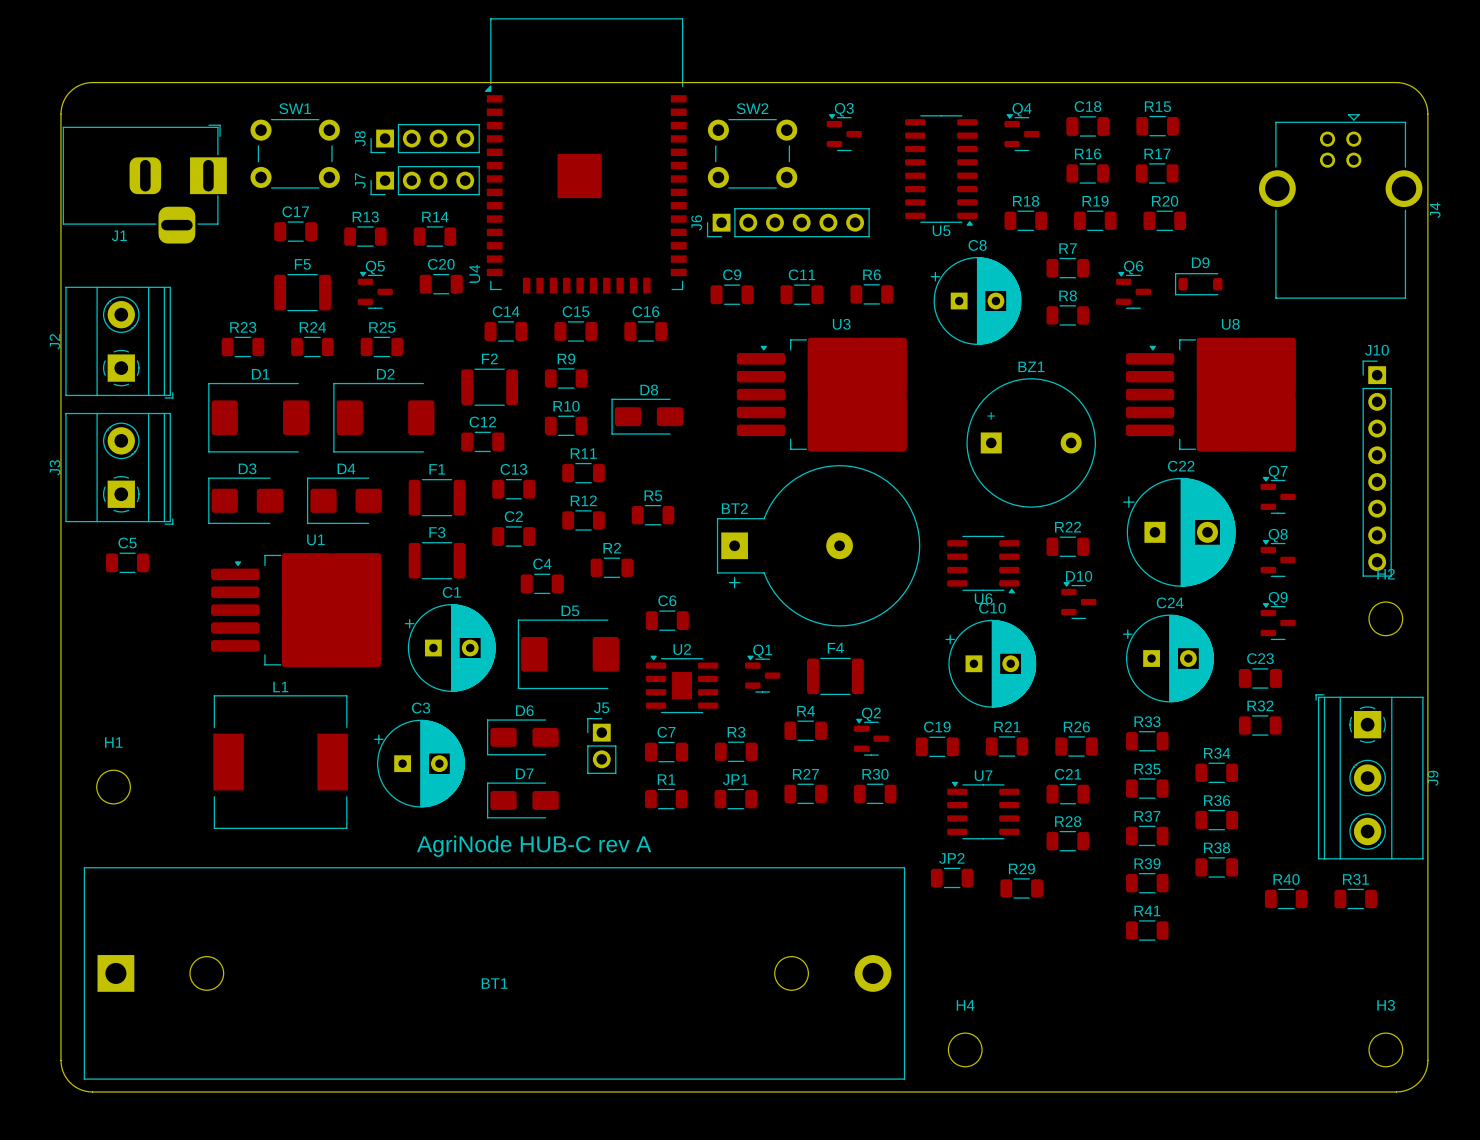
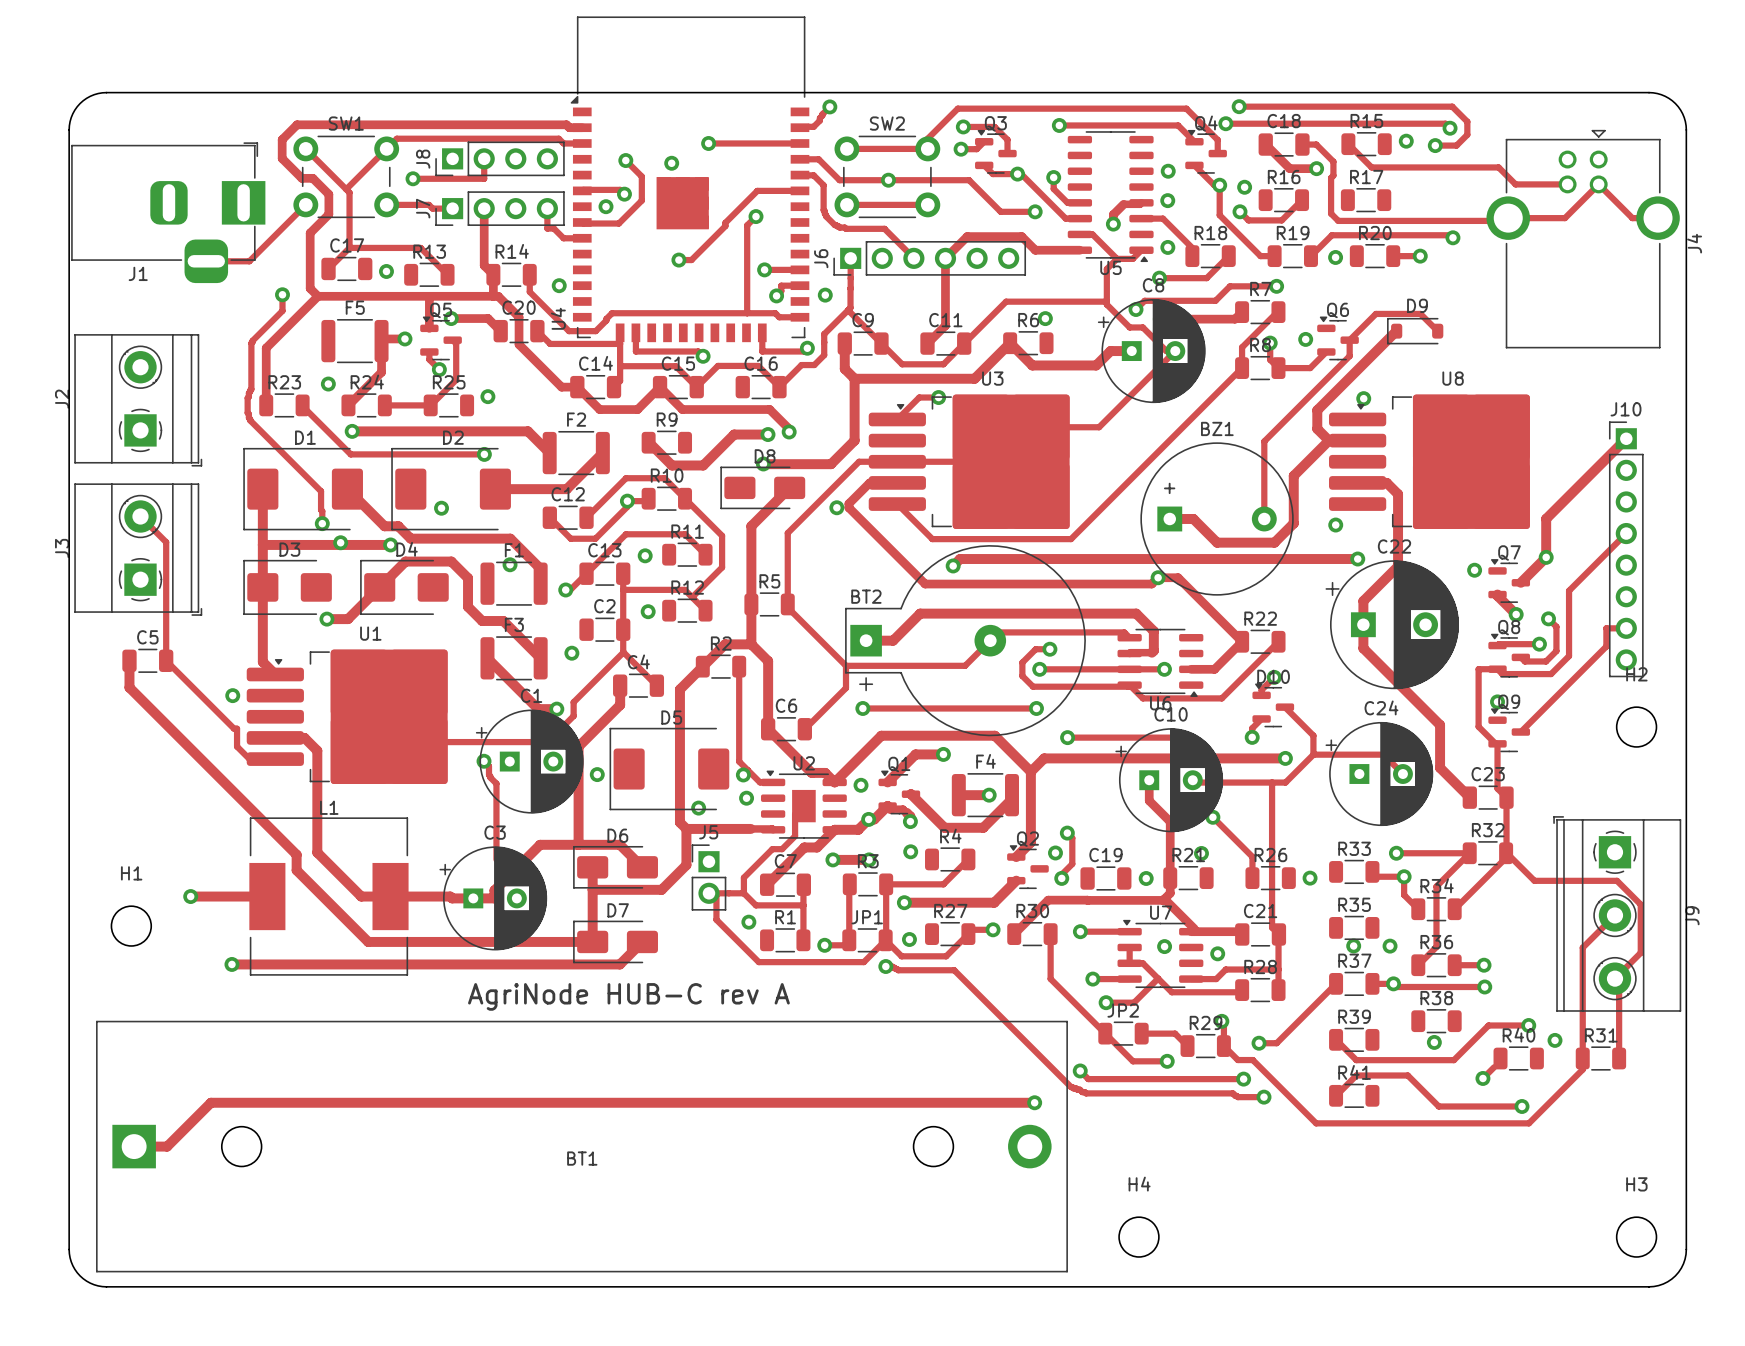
track: none -> (829, 106) (813, 126) (808, 126)
via: none -> (829, 106)
track: none -> (1239, 106) (1452, 106) (1467, 121) (1467, 134) (1456, 145) (1435, 145)
via: none -> (1239, 106)
track: none -> (1225, 123) (1445, 123) (1450, 128)
via: none -> (1225, 123)
track: none -> (1059, 125) (1178, 125) (1194, 141)
via: none -> (1059, 125)
track: none -> (963, 126) (994, 126) (1007, 139) (1007, 153)
via: none -> (963, 126)
track: none -> (582, 127) (569, 127) (566, 124) (297, 124) (282, 139) (282, 158) (301, 178) (312, 178) (328, 194) (328, 214) (310, 233) (310, 288) (318, 296)
via: none -> (1450, 128)
via: none -> (1406, 141)
track: none -> (984, 141) (976, 149) (961, 149)
track: none -> (582, 143) (563, 143) (558, 138) (396, 138) (346, 189)
track: none -> (708, 143) (799, 143)
via: none -> (708, 143)
track: none -> (1265, 144) (1289, 168) (1316, 168)
track: none -> (1302, 144) (1316, 144) (1333, 161) (1333, 175) (1331, 177) (1331, 213) (1338, 220) (1505, 220) (1508, 218) (1564, 218) (1598, 184) (1632, 218) (1658, 218)
track: none -> (1348, 144) (1371, 167) (1498, 167) (1515, 184) (1567, 184)
via: none -> (1435, 145)
track: none -> (305, 148) (349, 192) (349, 247)
track: none -> (846, 148) (927, 148) (927, 138) (957, 108) (1186, 108) (1217, 139) (1217, 153)
via: none -> (961, 149)
track: none -> (484, 158) (484, 178) (413, 178)
track: none -> (799, 159) (818, 159) (839, 180) (969, 180) (1000, 211) (1035, 211)
track: none -> (625, 160) (641, 176) (641, 200) (618, 223) (582, 222)
via: none -> (625, 160)
via: none -> (671, 163)
track: none -> (984, 165) (992, 174) (1021, 174) (1065, 218) (1079, 218)
track: none -> (1194, 165) (1214, 185) (1219, 185) (1219, 215) (1260, 256) (1274, 256)
via: none -> (1316, 168)
via: none -> (1168, 171)
via: none -> (1017, 174)
track: none -> (808, 175) (813, 175) (823, 185) (823, 210) (826, 216) (834, 225) (846, 228) (884, 228) (906, 251)
track: none -> (1053, 177) (1053, 188) (1067, 202) (1079, 202)
via: none -> (1053, 177)
via: none -> (413, 178)
via: none -> (888, 180)
via: none -> (1219, 185)
via: none -> (1244, 187)
track: none -> (582, 190) (620, 189) (624, 194)
track: none -> (799, 190) (757, 190) (691, 260) (678, 260)
via: none -> (624, 194)
via: none -> (1167, 200)
track: none -> (1302, 200) (1281, 220) (1248, 220) (1240, 211)
track: none -> (1141, 202) (1123, 204) (1113, 214) (1113, 224)
track: none -> (305, 204) (249, 261) (206, 261)
track: none -> (386, 204) (428, 204) (432, 208) (452, 208)
track: none -> (846, 204) (927, 204)
via: none -> (606, 206)
track: none -> (484, 208) (484, 265) (493, 274) (493, 296)
track: none -> (547, 208) (547, 228) (553, 228) (563, 238) (582, 238)
via: none -> (1035, 211)
via: none -> (1240, 211)
track: none -> (756, 216) (747, 225) (747, 313)
via: none -> (756, 216)
track: none -> (1141, 218) (1162, 218) (1192, 248) (1192, 256)
via: none -> (1113, 224)
track: none -> (1079, 234) (1092, 234) (1117, 258)
track: none -> (1452, 237) (1450, 235) (1331, 235) (1310, 256)
via: none -> (1452, 237)
track: none -> (349, 247) (328, 268)
track: none -> (349, 247) (420, 247) (447, 274)
via: none -> (1167, 247)
track: none -> (1079, 250) (1035, 250) (1021, 236) (967, 236) (945, 258) (945, 325) (927, 343)
track: none -> (1141, 250) (1132, 258) (1117, 258)
track: none -> (1228, 256) (1206, 278) (1159, 278)
track: none -> (1393, 256) (1420, 256)
via: none -> (1420, 256)
via: none -> (1335, 257)
track: none -> (850, 258) (850, 307) (824, 334) (824, 355) (814, 365) (801, 365) (779, 387) (758, 365) (717, 365) (696, 387) (675, 366) (620, 366)
track: none -> (1117, 258) (1106, 269) (1106, 304) (1129, 327) (1142, 327) (1166, 351) (1175, 351) (1099, 427) (980, 427)
via: none -> (678, 260)
track: none -> (764, 269) (799, 269)
via: none -> (764, 269)
via: none -> (386, 271)
track: none -> (529, 274) (529, 291) (569, 331) (595, 331) (612, 313) (775, 313) (779, 317) (799, 317)
via: none -> (1159, 278)
via: none -> (559, 285)
track: none -> (799, 285) (781, 285) (781, 291) (776, 295)
track: none -> (1276, 286) (1230, 286) (1215, 300) (1144, 300) (1136, 309)
via: none -> (1276, 286)
track: none -> (282, 294) (282, 310) (251, 343) (251, 389) (247, 398) (247, 412) (250, 420) (321, 491) (322, 523)
via: none -> (282, 294)
via: none -> (825, 295)
track: none -> (318, 296) (266, 348) (266, 405)
track: none -> (318, 296) (498, 296) (519, 317) (519, 344) (561, 387) (577, 387) (599, 409) (637, 409) (660, 387) (682, 409) (769, 409) (789, 428) (789, 431)
track: none -> (429, 296) (429, 328)
via: none -> (776, 295)
track: none -> (1106, 301) (1006, 301) (943, 364) (902, 364) (848, 310)
via: none -> (1136, 309)
track: none -> (1242, 312) (1235, 319) (1160, 319)
track: none -> (1278, 312) (1242, 347) (1242, 368) (1071, 539) (932, 539) (897, 504)
track: none -> (451, 318) (488, 318) (500, 331)
via: none -> (451, 318)
via: none -> (1045, 318)
track: none -> (537, 331) (550, 343) (620, 343)
track: none -> (1396, 331) (1317, 410) (1317, 428) (1328, 440)
track: none -> (1437, 331) (1420, 313) (1375, 313) (1349, 340) (1349, 356) (1264, 441) (1264, 518)
track: none -> (620, 332) (620, 381) (614, 387)
track: none -> (635, 332) (635, 351) (698, 351) (703, 356)
track: none -> (762, 332) (762, 351) (804, 351) (807, 348)
track: none -> (404, 338) (383, 338) (381, 341) (381, 372) (348, 405)
via: none -> (404, 338)
track: none -> (452, 340) (456, 343) (456, 379) (430, 405) (384, 405)
via: none -> (1305, 339)
track: none -> (844, 343) (844, 368) (854, 378)
track: none -> (1270, 343) (1270, 359) (1278, 368) (1310, 368) (1326, 351)
via: none -> (1270, 343)
via: none -> (807, 348)
track: none -> (429, 351) (429, 359) (439, 369)
track: none -> (1131, 351) (1110, 351) (1096, 365) (1032, 365) (1010, 343) (974, 378) (854, 378)
via: none -> (703, 356)
via: none -> (439, 369)
track: none -> (854, 378) (854, 440) (831, 464) (763, 463)
via: none -> (328, 384)
via: none -> (487, 396)
track: none -> (938, 397) (919, 397) (897, 419)
via: none -> (938, 397)
via: none -> (1363, 398)
track: none -> (302, 405) (350, 454) (484, 454)
track: none -> (352, 431) (527, 431) (549, 453)
via: none -> (352, 431)
via: none -> (789, 431)
track: none -> (768, 434) (734, 434) (703, 465) (672, 465) (648, 442)
via: none -> (768, 434)
track: none -> (1626, 438) (1546, 518) (1546, 557) (1520, 582)
track: none -> (1328, 440) (1293, 475) (1293, 523) (1274, 542) (1217, 542) (1193, 518) (1169, 518)
track: none -> (602, 453) (566, 489) (495, 489)
via: none -> (484, 454)
track: none -> (1011, 461) (859, 461) (787, 533) (787, 607) (846, 665)
via: none -> (763, 463)
track: none -> (897, 482) (869, 482) (848, 503) (848, 507) (925, 584) (1151, 584) (1158, 577) (1178, 577) (1242, 641) (1214, 669) (1191, 669)
track: none -> (1357, 482) (1386, 482) (1398, 494) (1398, 566) (1363, 601) (1363, 648) (1440, 725) (1440, 767) (1469, 797)
track: none -> (789, 487) (751, 526) (751, 644)
track: none -> (262, 489) (262, 661) (275, 674)
track: none -> (347, 489) (384, 526) (398, 526) (410, 538) (510, 538) (540, 568) (540, 583)
track: none -> (648, 498) (646, 501) (627, 501) (627, 506) (595, 538) (570, 538) (549, 517)
via: none -> (627, 501)
via: none -> (441, 508)
via: none -> (836, 507)
track: none -> (140, 516) (166, 542) (166, 660) (234, 728) (237, 728) (237, 746) (249, 759) (275, 759)
track: none -> (586, 517) (626, 478) (664, 478) (722, 535) (722, 567) (692, 597)
via: none -> (322, 523)
via: none -> (1335, 525)
track: none -> (1626, 533) (1569, 590) (1569, 656) (1551, 674) (1502, 674) (1497, 669) (1478, 669) (1478, 726) (1497, 743) (1497, 788) (1506, 797) (1506, 852)
via: none -> (340, 542)
track: none -> (262, 544) (390, 544)
via: none -> (390, 544)
track: none -> (705, 554) (685, 534) (625, 534) (570, 589) (565, 589)
via: none -> (645, 555)
via: none -> (1546, 557)
track: none -> (1357, 559) (960, 559) (953, 565)
via: none -> (1357, 559)
via: none -> (510, 564)
via: none -> (953, 565)
via: none -> (1474, 570)
track: none -> (623, 573) (623, 652) (656, 685)
via: none -> (1158, 577)
via: none -> (565, 589)
track: none -> (623, 589) (684, 589) (705, 610)
track: none -> (1497, 594) (1516, 614)
via: none -> (648, 611)
via: none -> (1516, 614)
track: none -> (326, 619) (348, 619) (405, 561) (451, 561) (468, 578) (468, 606) (482, 620) (503, 620) (540, 658)
via: none -> (326, 619)
track: none -> (1548, 618) (1556, 626) (1556, 651) (1546, 661) (1524, 661) (1520, 657)
via: none -> (1548, 618)
track: none -> (1626, 628) (1606, 628) (1606, 646) (1520, 732)
track: none -> (1129, 637) (1124, 632) (998, 632) (965, 665) (846, 665)
track: none -> (866, 640) (893, 640) (920, 613) (1136, 613) (1153, 631) (1153, 650) (1151, 652) (1129, 653)
track: none -> (1278, 641) (1221, 698) (1142, 698) (1129, 685) (1128, 686) (1033, 686) (1022, 676) (1022, 662) (1035, 649) (1049, 649)
track: none -> (751, 644) (768, 661) (768, 729) (811, 772) (825, 772) (834, 782) (881, 735) (994, 735) (1030, 771)
track: none -> (751, 644) (725, 644) (679, 689) (679, 822) (686, 828)
track: none -> (1539, 644) (1497, 645)
via: none -> (1539, 644)
via: none -> (1049, 649)
track: none -> (623, 652) (573, 702) (573, 716) (547, 742) (428, 742) (419, 751) (359, 751)
via: none -> (571, 653)
track: none -> (487, 658) (538, 709) (556, 709)
track: none -> (129, 660) (129, 687) (296, 854) (296, 870) (368, 941) (592, 941) (592, 867)
track: none -> (739, 666) (739, 761) (760, 782) (773, 782)
track: none -> (846, 665) (846, 688) (804, 729)
track: none -> (1039, 669) (1164, 669)
via: none -> (1039, 669)
via: none -> (1164, 669)
track: none -> (1274, 677) (1261, 690) (1261, 695)
via: none -> (1274, 677)
track: none -> (620, 685) (620, 705) (578, 746) (578, 844)
via: none -> (232, 695)
via: none -> (1497, 701)
track: none -> (1284, 707) (1313, 735) (1313, 754)
via: none -> (556, 709)
track: none -> (862, 708) (1036, 708)
via: none -> (862, 708)
via: none -> (1036, 708)
track: none -> (1261, 718) (1252, 728) (1252, 737)
track: none -> (1067, 737) (1189, 737)
via: none -> (1067, 737)
via: none -> (1252, 737)
track: none -> (275, 737) (304, 737) (317, 750) (317, 852) (361, 896) (494, 898) (494, 890) (540, 844) (619, 844) (642, 867)
track: none -> (943, 754) (915, 754) (887, 782)
via: none -> (943, 754)
track: none -> (1313, 754) (1285, 782) (1195, 782) (1192, 780)
track: none -> (1313, 754) (1383, 754) (1402, 774)
track: none -> (1285, 758) (1044, 758) (1030, 771)
via: none -> (1285, 758)
track: none -> (484, 761) (488, 766) (490, 777) (496, 783) (496, 859)
via: none -> (484, 761)
track: none -> (1030, 771) (1030, 842) (1016, 857)
via: none -> (597, 774)
via: none -> (743, 774)
track: none -> (1149, 780) (1149, 800) (1170, 821) (1170, 893) (1163, 900) (1048, 900) (1014, 934)
track: none -> (1272, 782) (1272, 927) (1278, 934) (1278, 990)
via: none -> (861, 785)
track: none -> (911, 794) (944, 827) (983, 827) (1011, 799) (1011, 795)
track: none -> (958, 795) (989, 795)
via: none -> (989, 795)
via: none -> (746, 798)
via: none -> (698, 808)
track: none -> (795, 814) (795, 836) (782, 849) (772, 849) (743, 877) (743, 893)
track: none -> (1212, 817) (1252, 856) (1252, 878)
via: none -> (1212, 817)
via: none -> (868, 819)
track: none -> (910, 821) (910, 816) (903, 809) (890, 809) (887, 806) (874, 819) (868, 819) (858, 829) (834, 829) (817, 847) (804, 847) (767, 884)
via: none -> (910, 821)
track: none -> (686, 828) (686, 865) (661, 889) (592, 889)
track: none -> (686, 828) (773, 829)
track: none -> (1067, 833) (1072, 838) (1072, 864) (1061, 874) (1061, 878)
via: none -> (1067, 833)
via: none -> (910, 851)
via: none -> (1055, 852)
via: none -> (1201, 853)
track: none -> (1396, 853) (1469, 853) (1436, 886) (1436, 947) (1418, 965)
via: none -> (1396, 853)
track: none -> (1506, 852) (1534, 880) (1617, 880) (1640, 904) (1640, 952) (1614, 978) (1619, 982) (1619, 1058)
track: none -> (1506, 852) (1506, 857) (1454, 909)
track: none -> (968, 859) (943, 884) (886, 884) (886, 939) (863, 962) (758, 962) (716, 919) (716, 893)
track: none -> (832, 859) (869, 859)
via: none -> (832, 859)
via: none -> (869, 859)
track: none -> (1372, 871) (1377, 876) (1404, 876) (1404, 895) (1418, 909)
via: none -> (1404, 876)
via: none -> (1061, 878)
via: none -> (1146, 878)
via: none -> (1310, 878)
track: none -> (1016, 880) (994, 902) (904, 902)
track: none -> (849, 884) (849, 940) (844, 945) (824, 945)
track: none -> (803, 884) (803, 940)
track: none -> (708, 893) (743, 893)
track: none -> (743, 893) (755, 905) (803, 905)
track: none -> (190, 896) (267, 896)
via: none -> (190, 896)
track: none -> (1164, 898) (1194, 928) (1194, 931)
via: none -> (904, 902)
track: none -> (1614, 915) (1582, 947) (1582, 1069) (1528, 1123) (1316, 1123) (1252, 1060) (1237, 1060) (1223, 1046) (1223, 1023) (1221, 1021)
via: none -> (748, 922)
track: none -> (993, 929) (972, 929) (946, 956) (901, 956) (885, 940)
via: none -> (993, 929)
track: none -> (1080, 931) (1129, 931)
via: none -> (1080, 931)
track: none -> (1191, 931) (1239, 931) (1242, 934)
track: none -> (1050, 934) (1050, 978) (1132, 1061) (1167, 1061)
via: none -> (909, 939)
track: none -> (642, 941) (619, 964) (231, 964)
via: none -> (824, 945)
via: none -> (1353, 945)
via: none -> (1390, 946)
via: none -> (1164, 946)
track: none -> (1129, 947) (1129, 963) (1142, 963) (1158, 978)
via: none -> (1217, 953)
via: none -> (231, 964)
track: none -> (1454, 965) (1484, 965)
via: none -> (1484, 965)
track: none -> (885, 966) (892, 966) (898, 970) (954, 970) (1071, 1087) (1082, 1092) (1232, 1093) (1237, 1097) (1264, 1097)
via: none -> (885, 966)
track: none -> (1278, 969) (1225, 969) (1216, 979) (1191, 979)
track: none -> (1092, 979) (1129, 979)
via: none -> (1092, 979)
track: none -> (1158, 978) (1134, 1002) (1106, 1002)
track: none -> (1158, 978) (1171, 992) (1239, 992) (1242, 990)
track: none -> (1336, 983) (1276, 1043) (1259, 1043)
track: none -> (1372, 983) (1393, 983) (1396, 986) (1484, 986)
via: none -> (1393, 983)
via: none -> (1484, 986)
via: none -> (1106, 1002)
via: none -> (1221, 1021)
track: none -> (1528, 1025) (1488, 1025) (1453, 1060) (1356, 1060) (1336, 1039)
via: none -> (1528, 1025)
track: none -> (1141, 1033) (1175, 1033) (1187, 1046)
via: none -> (1555, 1040)
via: none -> (1434, 1042)
via: none -> (1259, 1043)
via: none -> (1167, 1061)
track: none -> (1494, 1067) (1482, 1078)
track: none -> (1080, 1070) (1088, 1079) (1243, 1079)
via: none -> (1080, 1070)
via: none -> (1482, 1078)
via: none -> (1243, 1079)
track: none -> (1336, 1095) (1356, 1075) (1407, 1075) (1438, 1106) (1522, 1106)
via: none -> (1264, 1097)
track: none -> (1034, 1102) (210, 1102) (167, 1146) (134, 1146)
via: none -> (1034, 1102)
via: none -> (1522, 1106)

